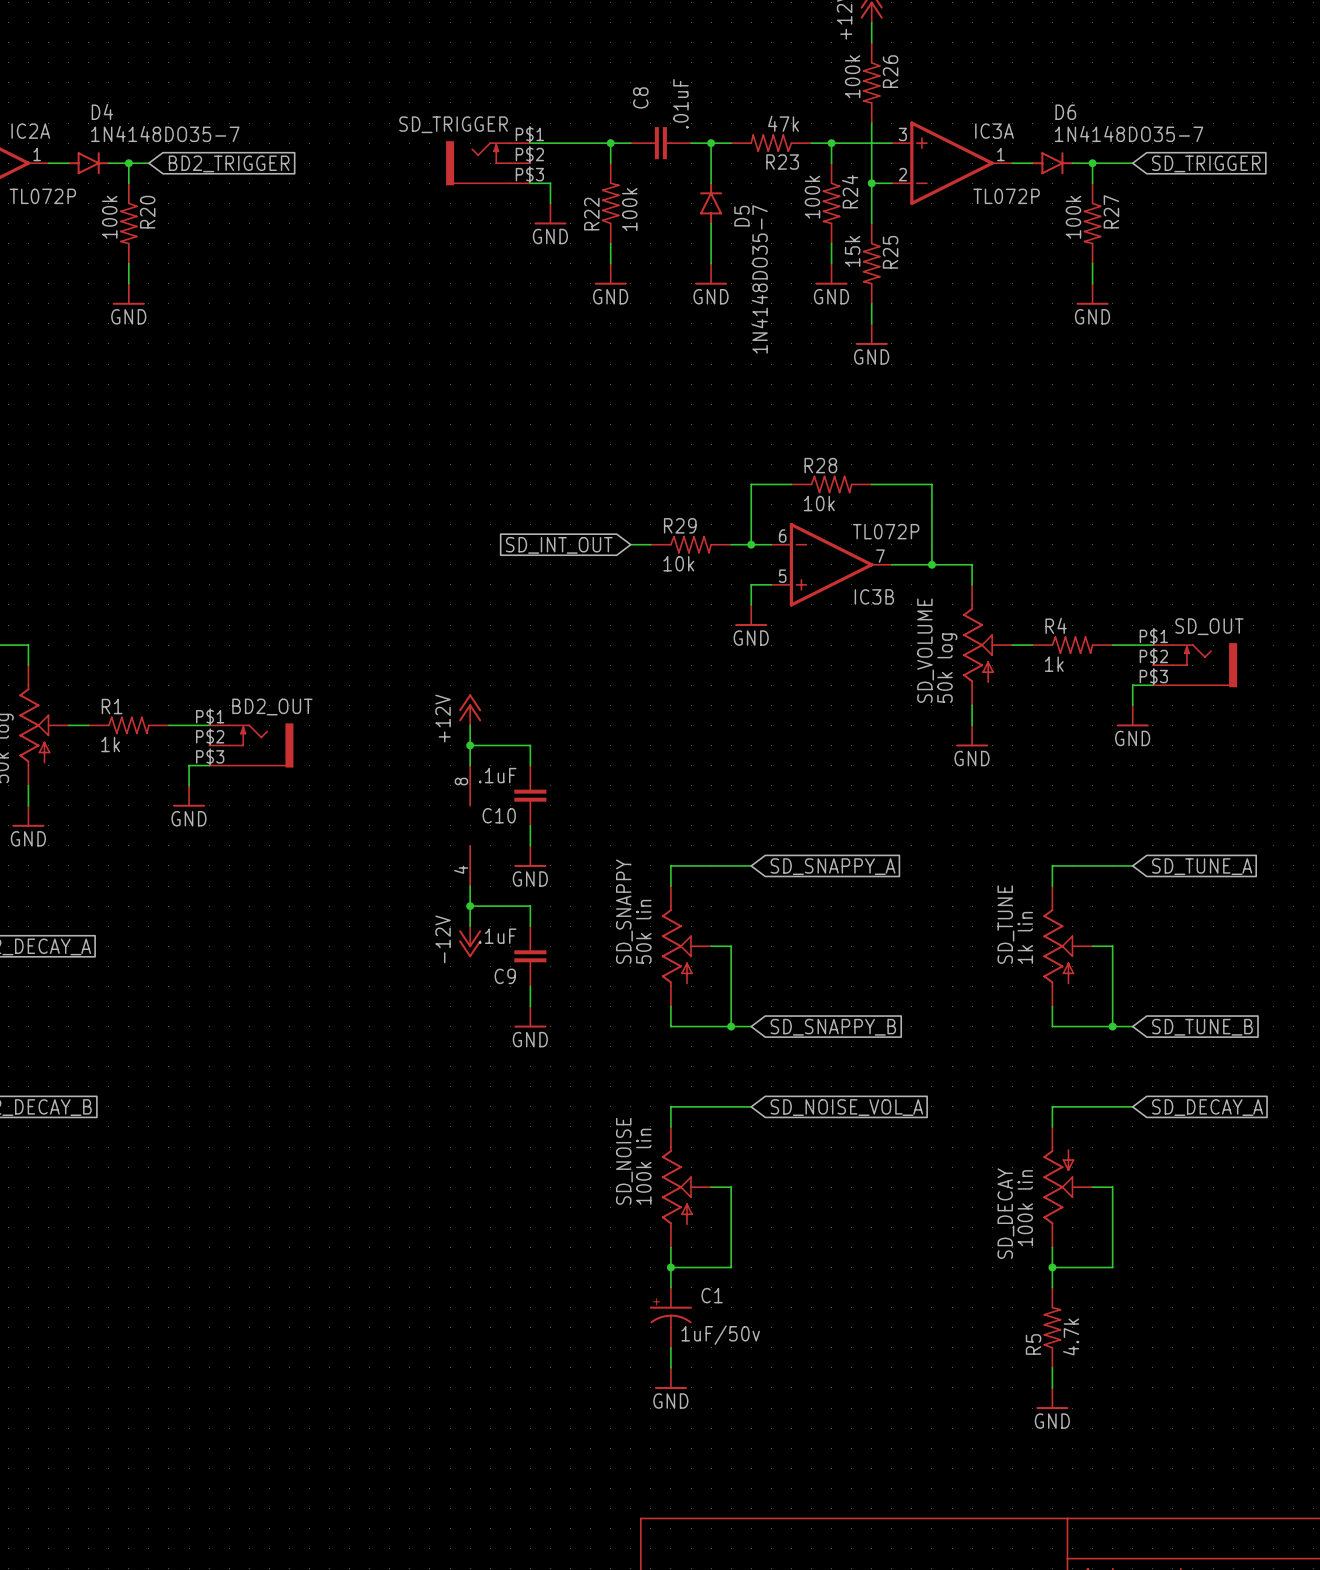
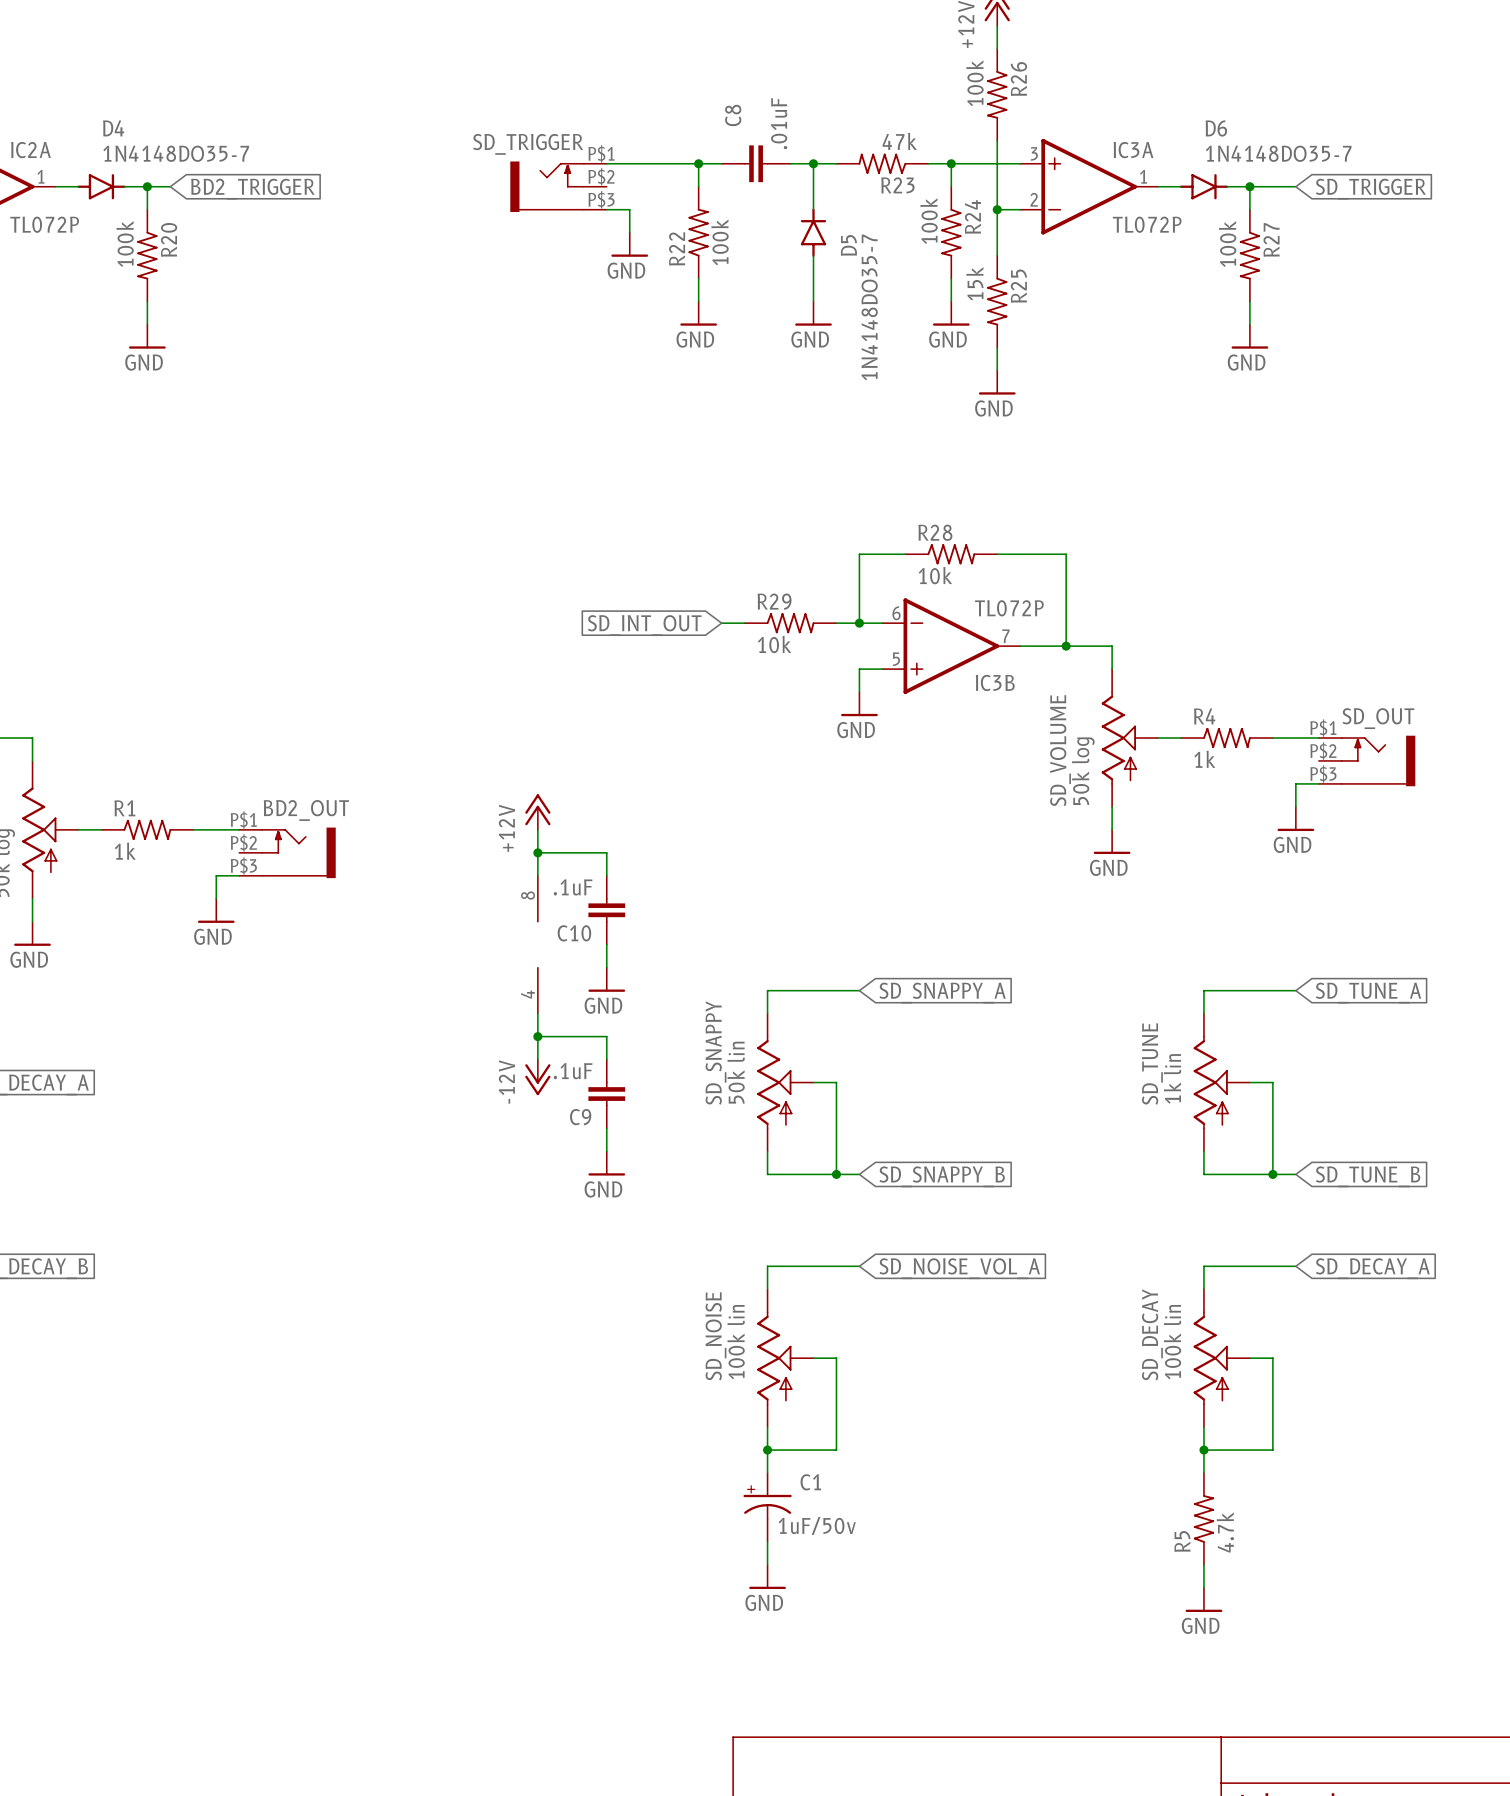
SD_DECAY flip: as is (1058, 1187) -> up-down (1211, 1358)

